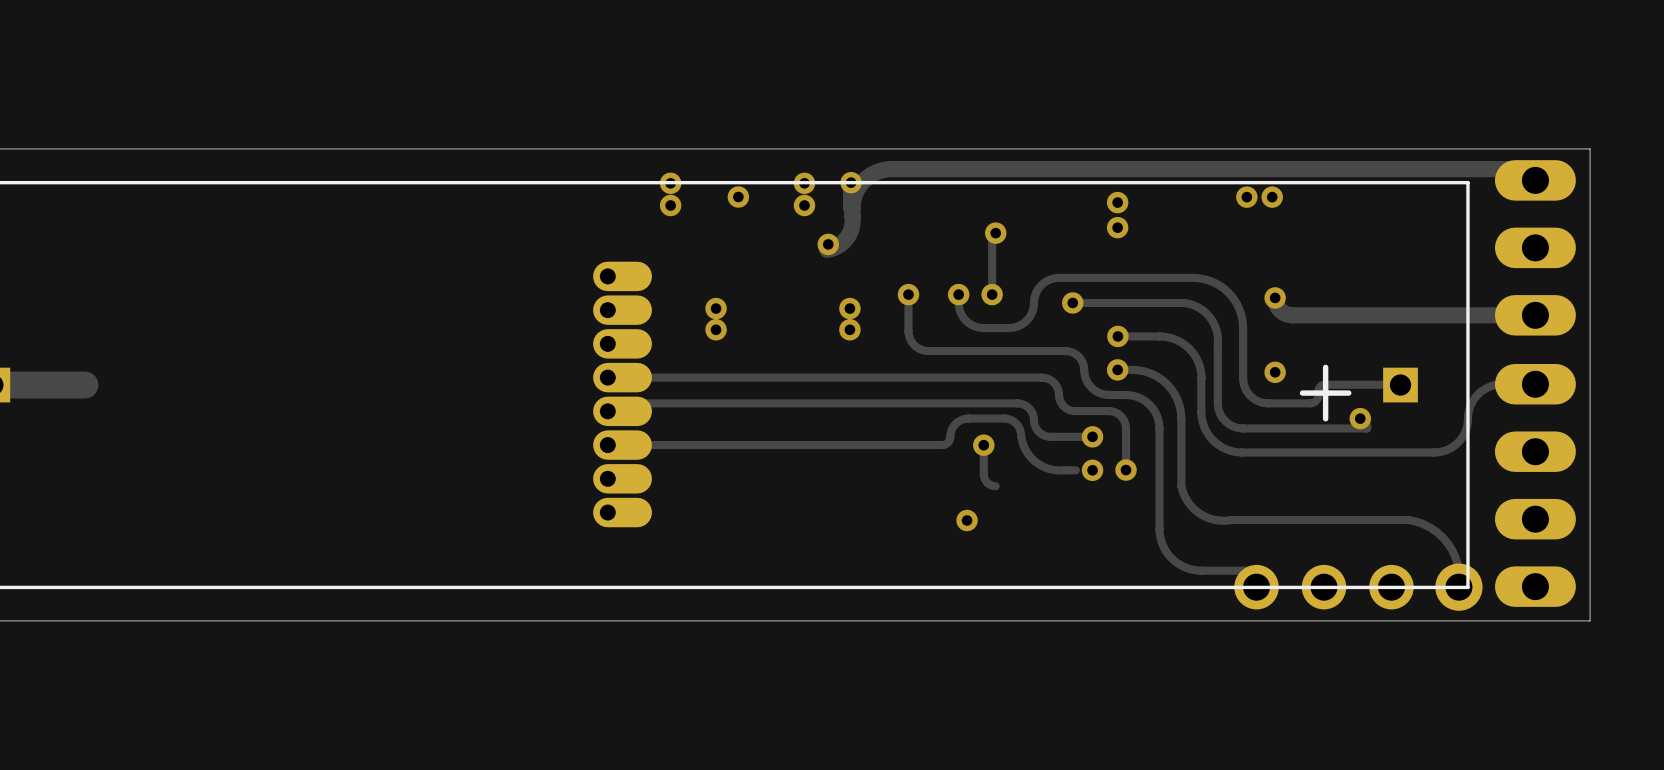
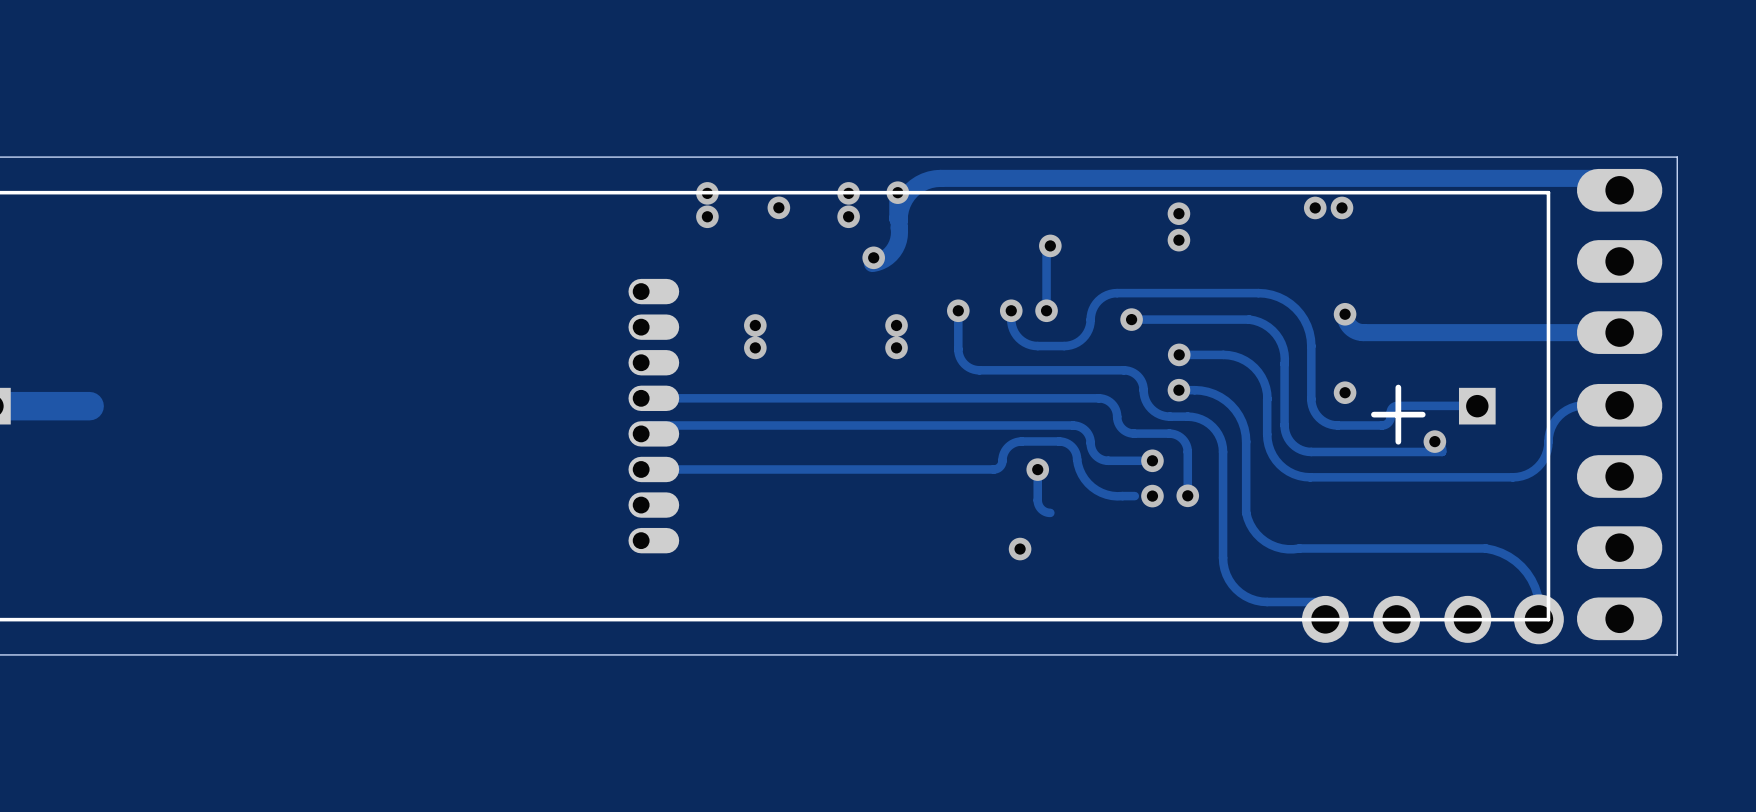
part footprint: [593, 261, 652, 528] -> [628, 278, 680, 554]

